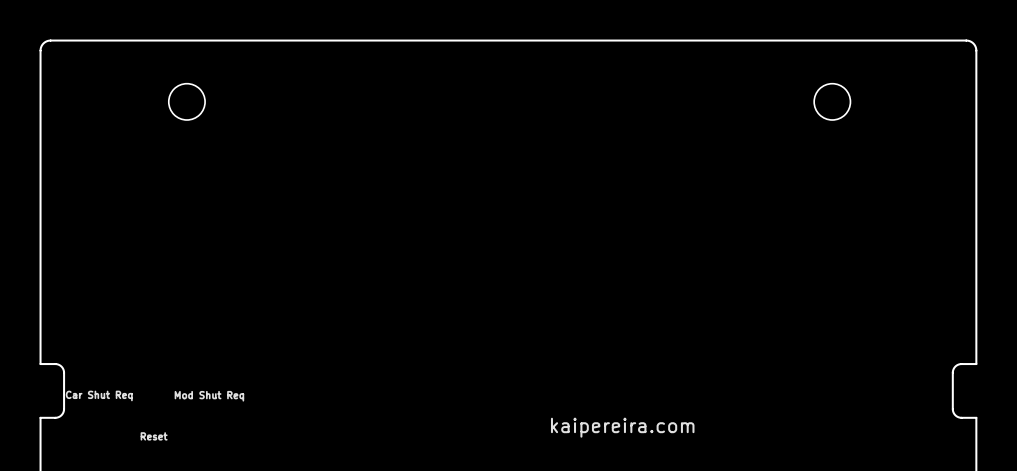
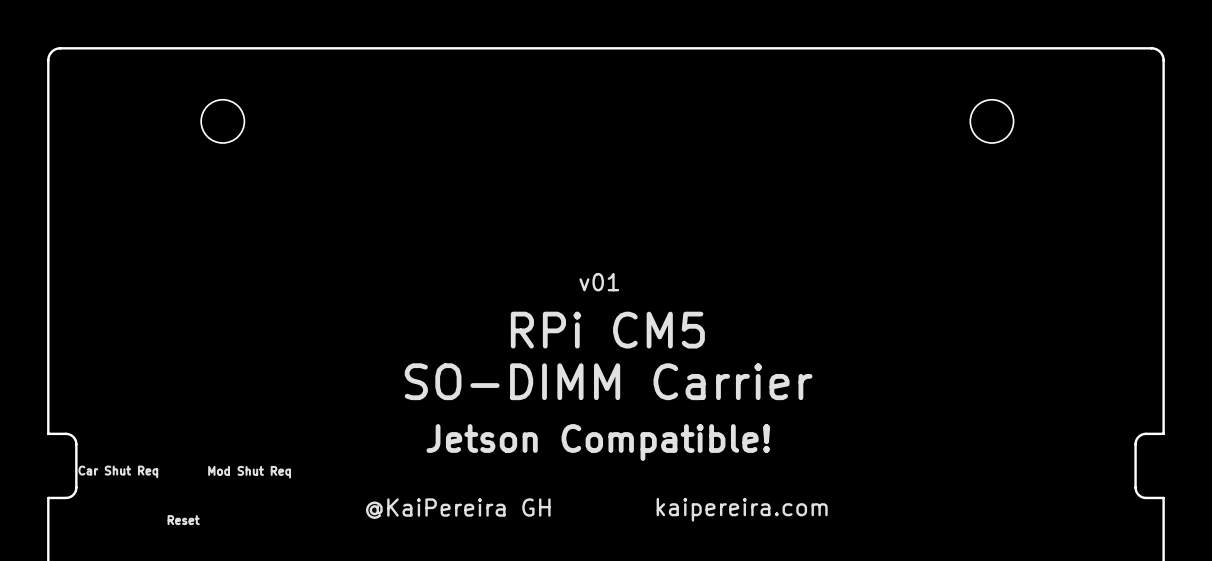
text: none -> v01 (599, 282)
text: none -> RPi CM5 (607, 330)
text: none -> SO-DIMM Carrier (608, 381)
text: none -> Jetson Compatible! (598, 442)
text: none -> @KaiPereira GH (458, 508)

